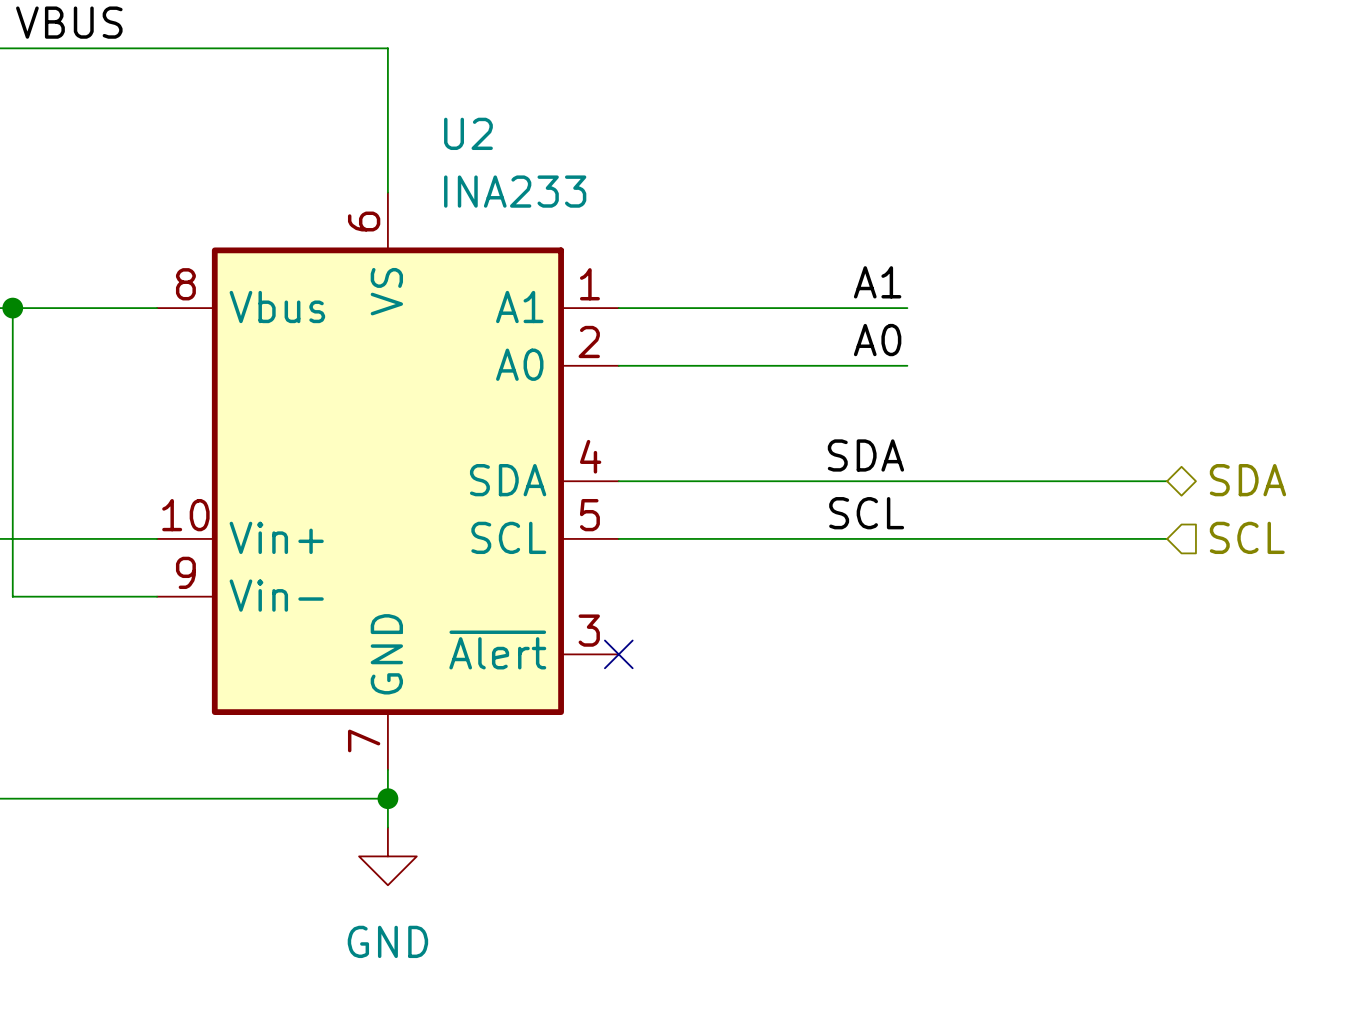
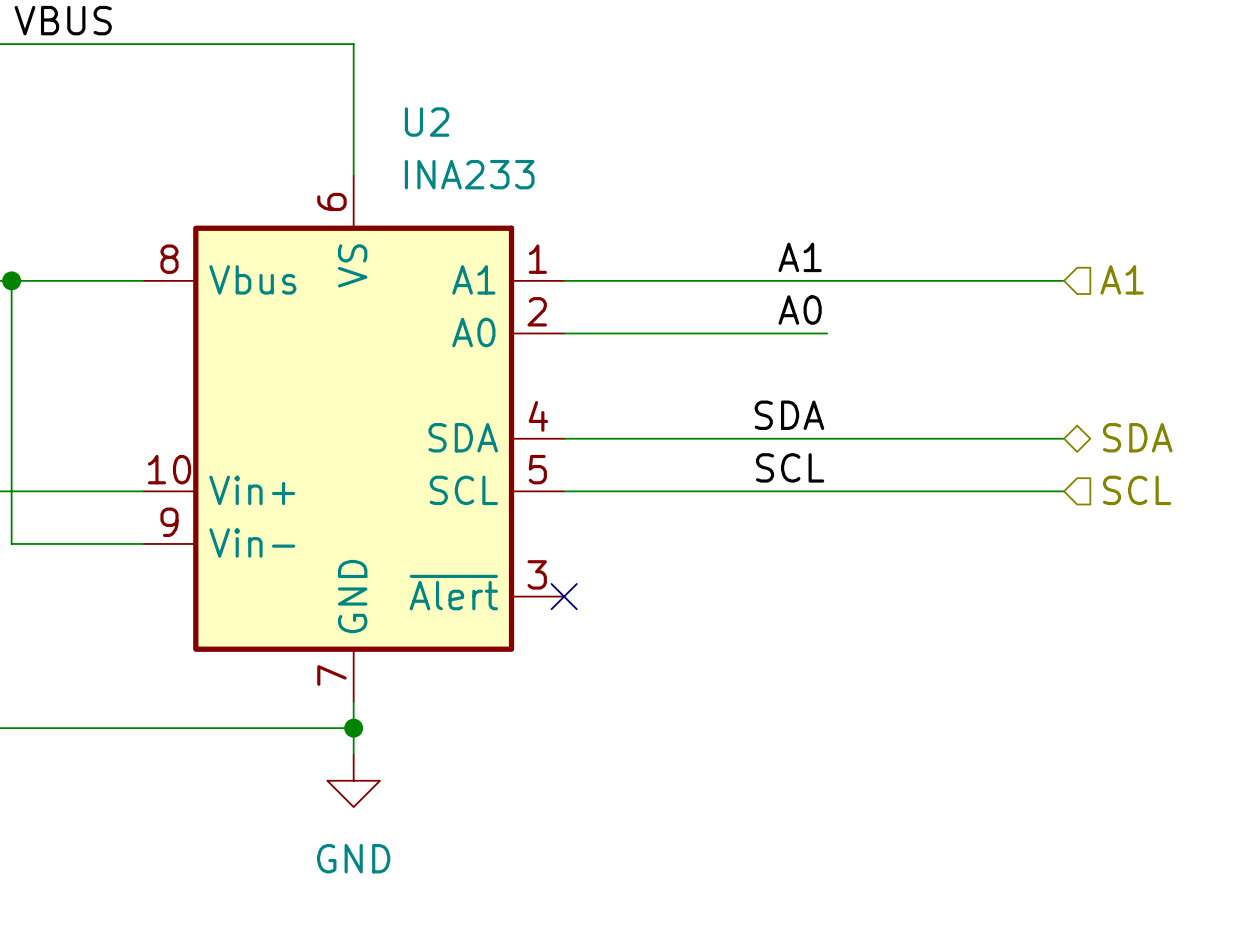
hierarchical label: none -> A1 (1122, 279)
wire: none -> (827, 280) (1064, 280)

